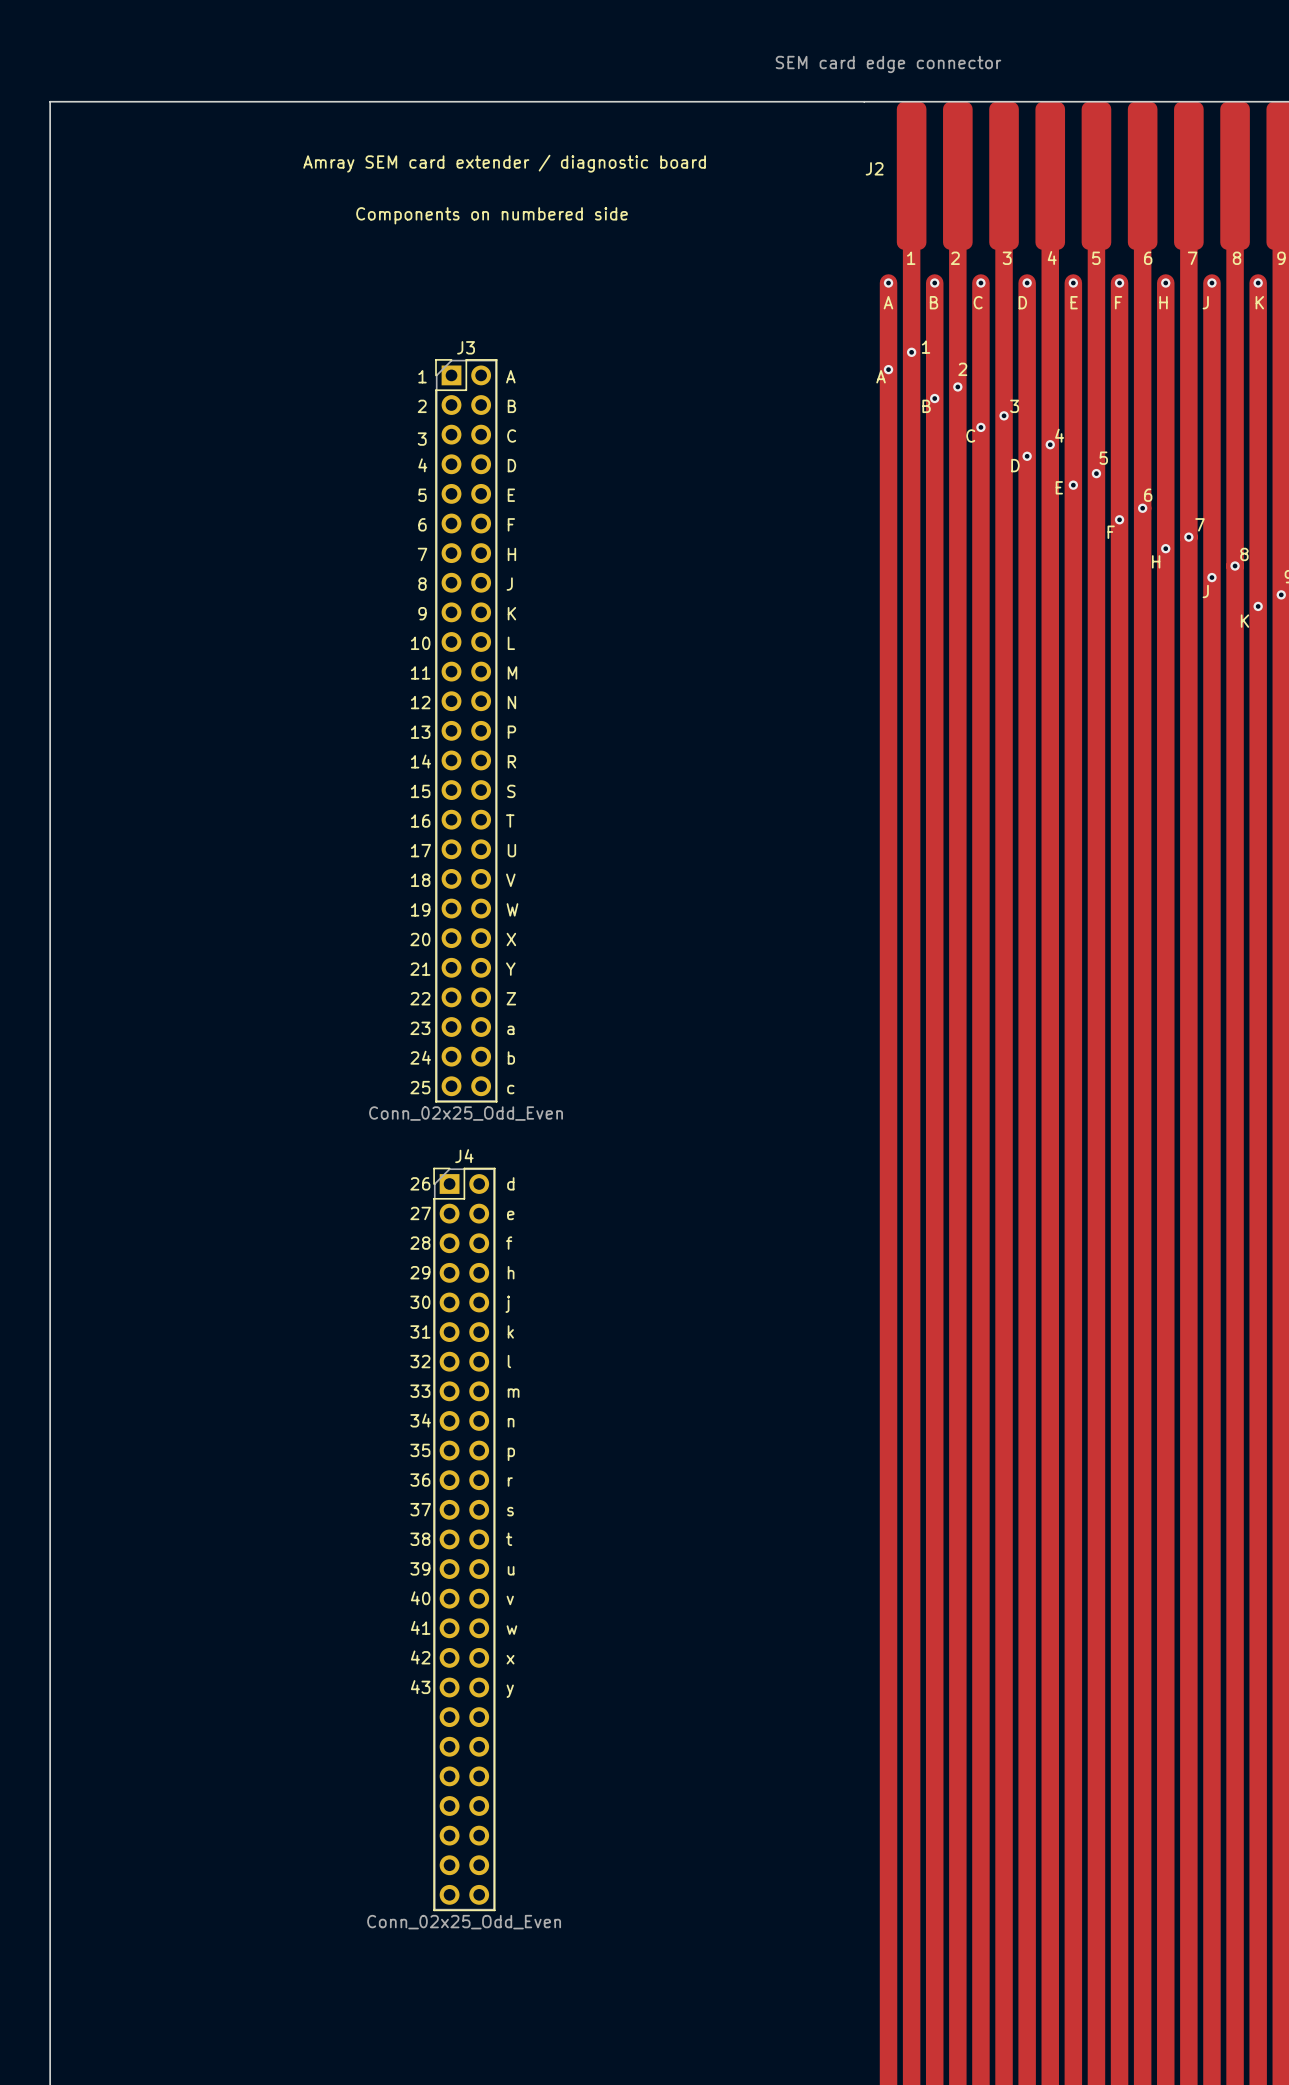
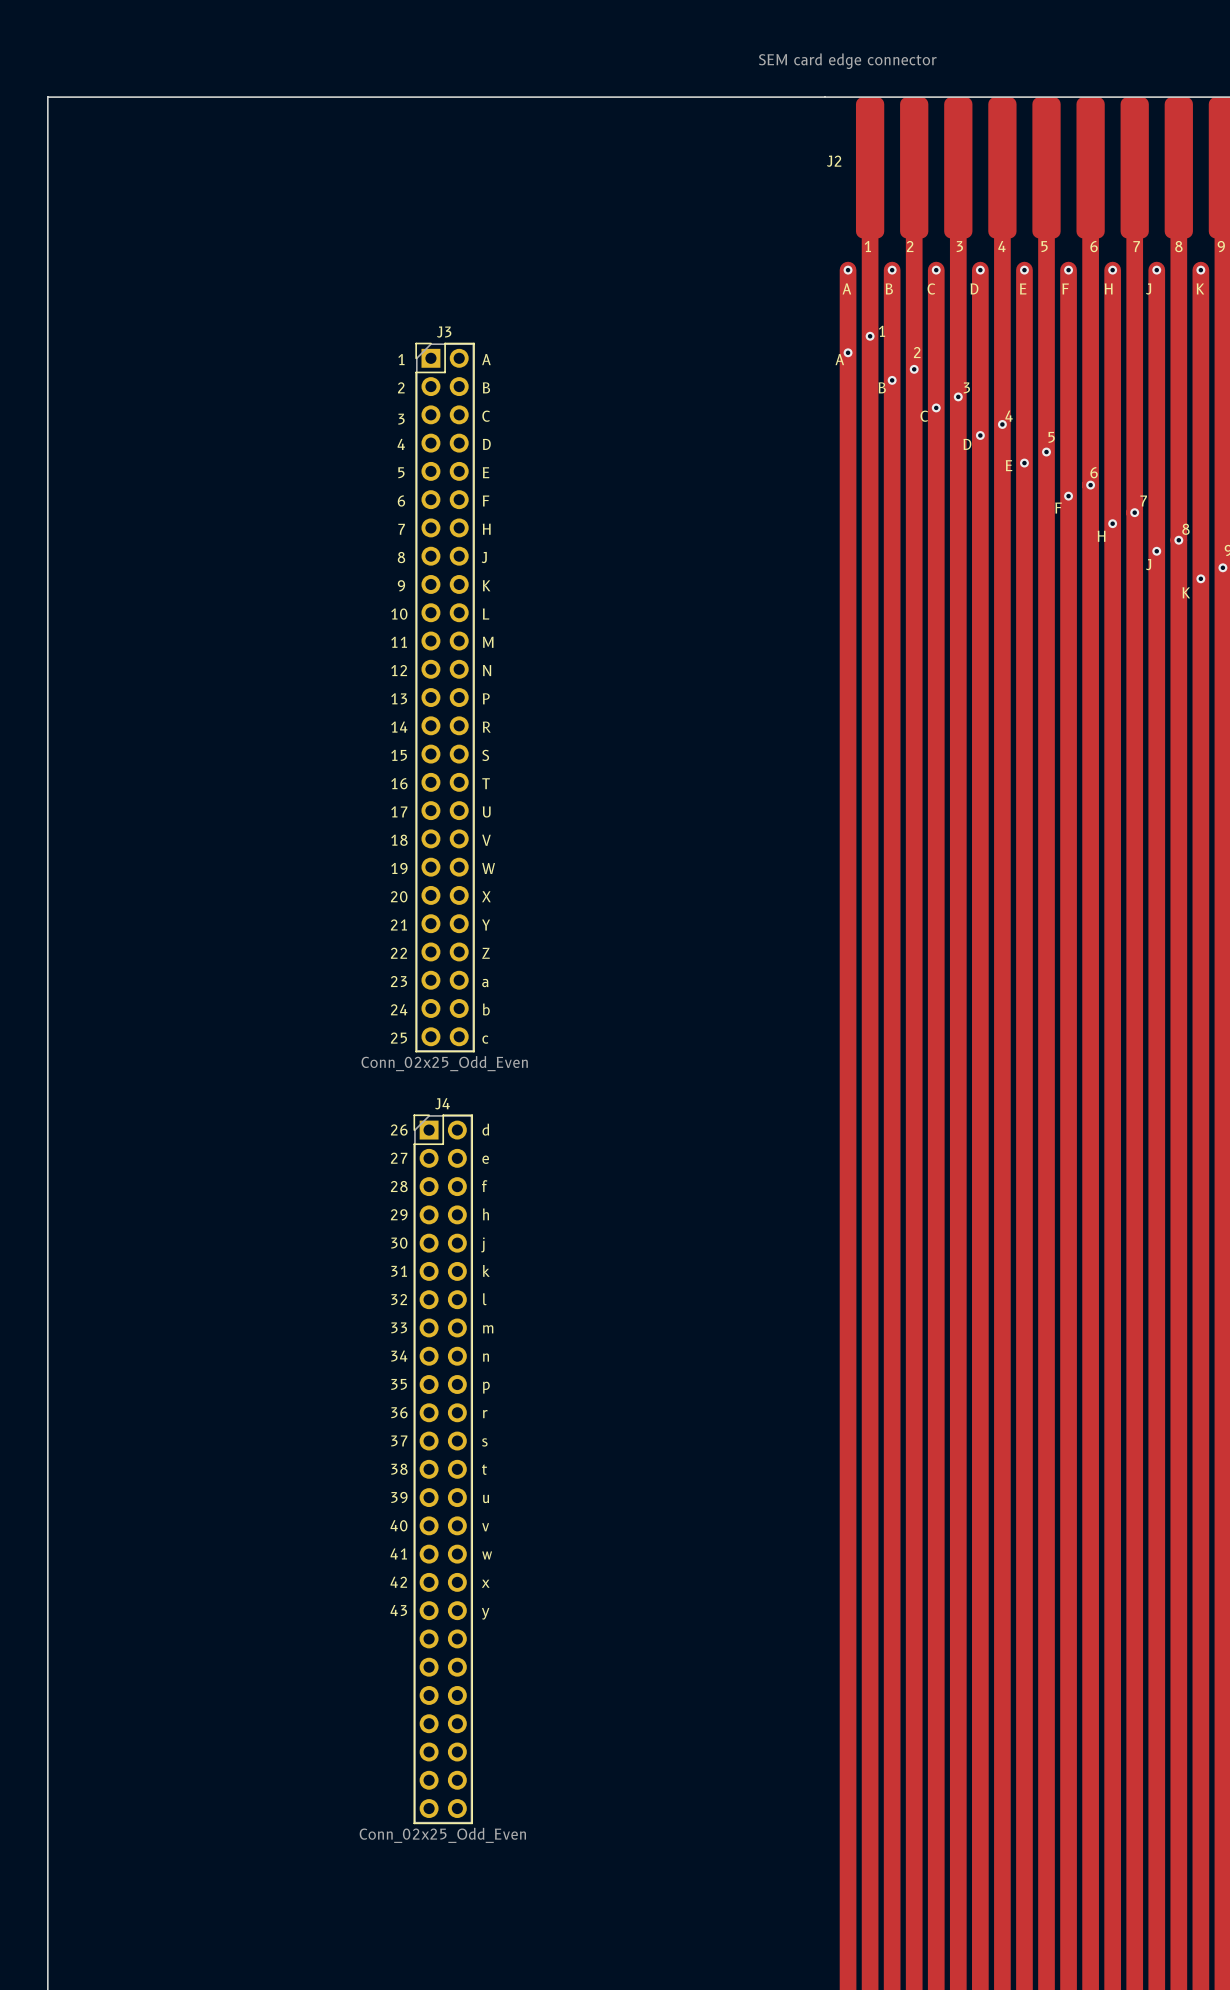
text: Amray SEM card extender / diagnostic board (504, 163) -> none
text: Components on numbered side (492, 215) -> none

